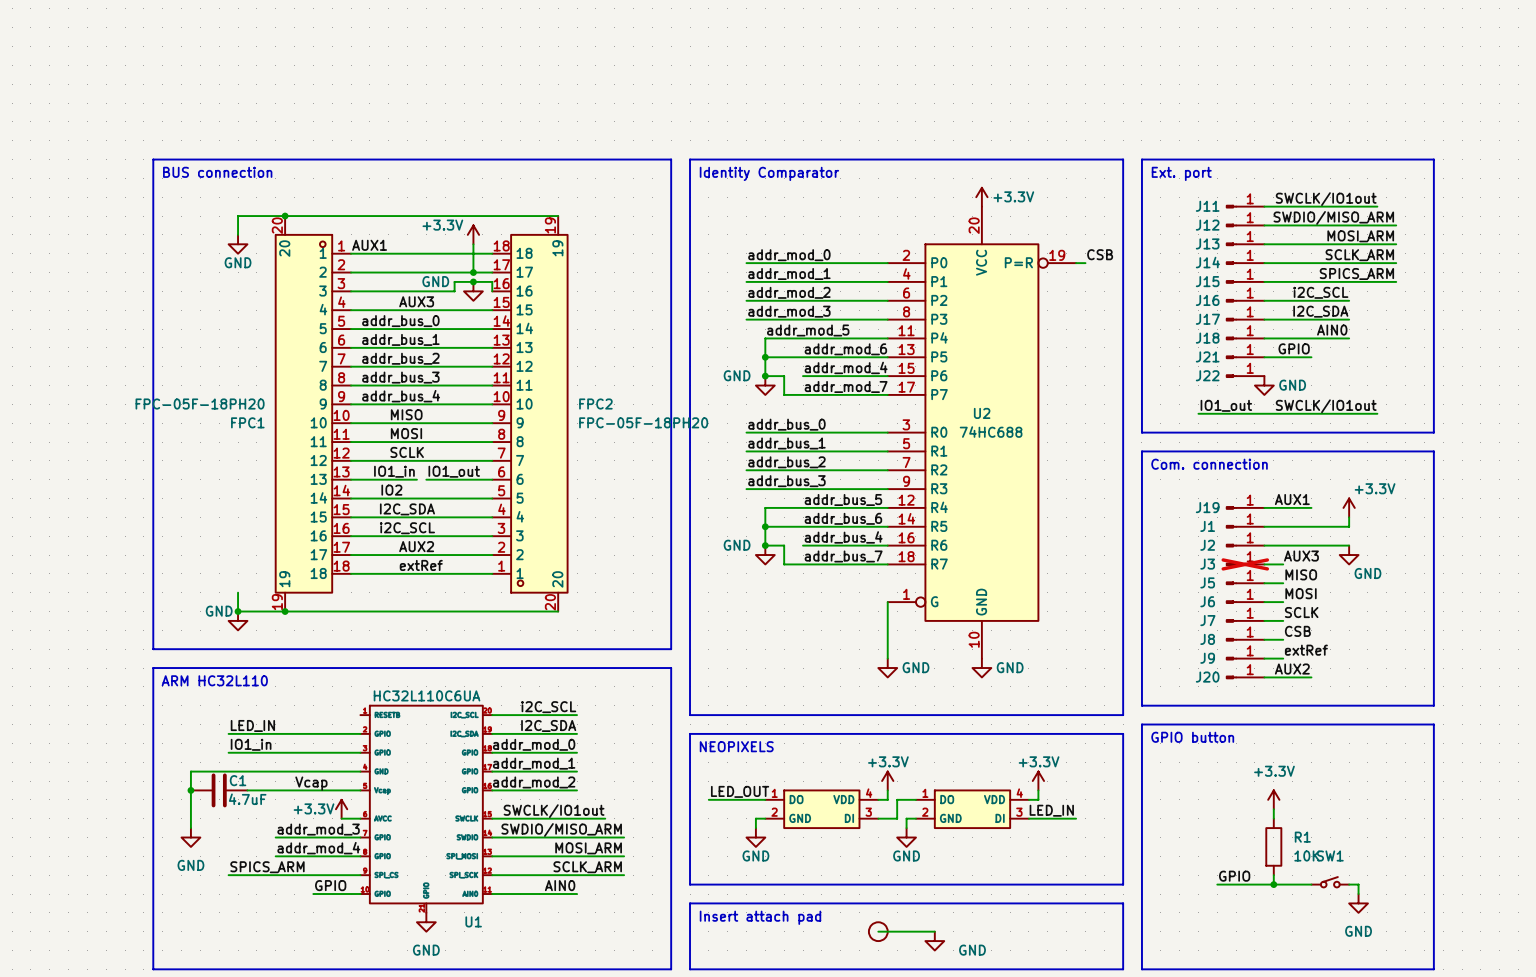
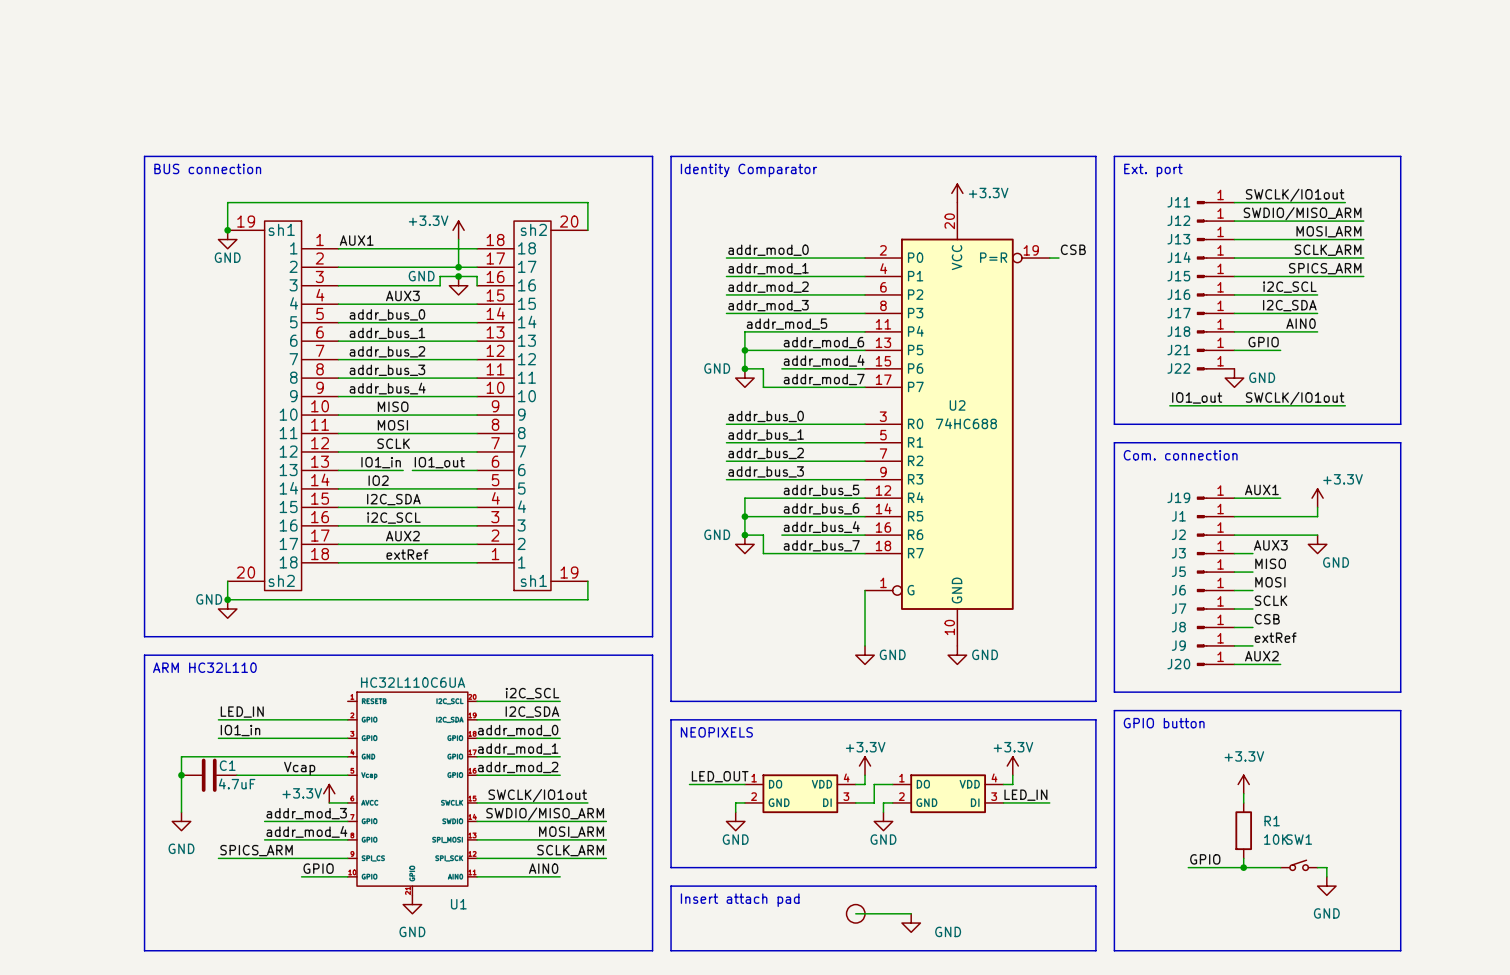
wire: (238, 216) (558, 216) -> (227, 211) (227, 202) (587, 202) (587, 230)
junction: (285, 216) -> none
junction: none -> (227, 230)
part: none -> (283, 405)
FPC1: FPC-05F-18PH20 (313, 413) -> none
FPC2: FPC-05F-18PH20 (529, 413) -> none
part: none -> (532, 405)
J3 do-not-place cross: (1245, 564) -> none
wire: none -> (587, 581) (587, 599) (541, 599)
junction: (285, 611) -> none

